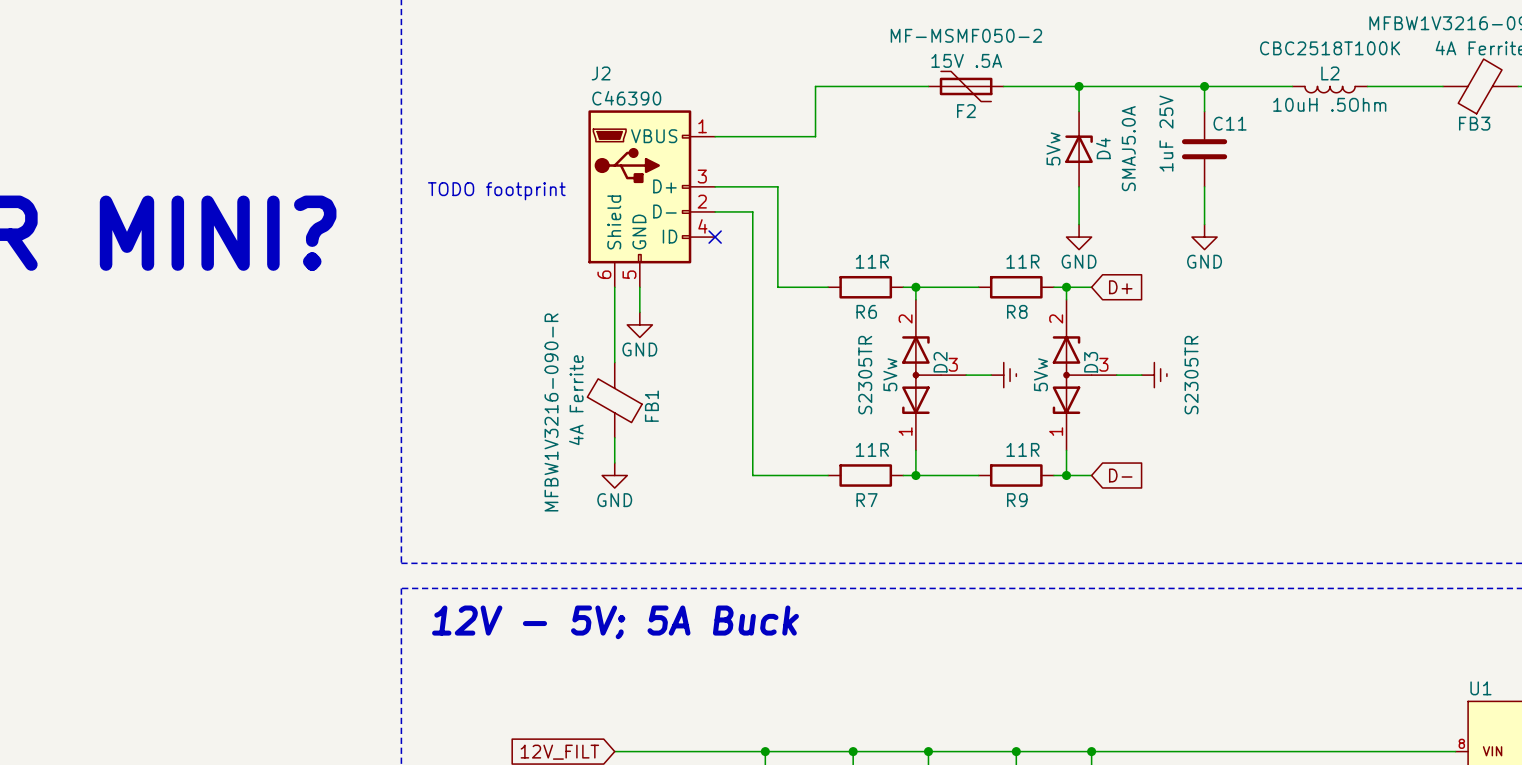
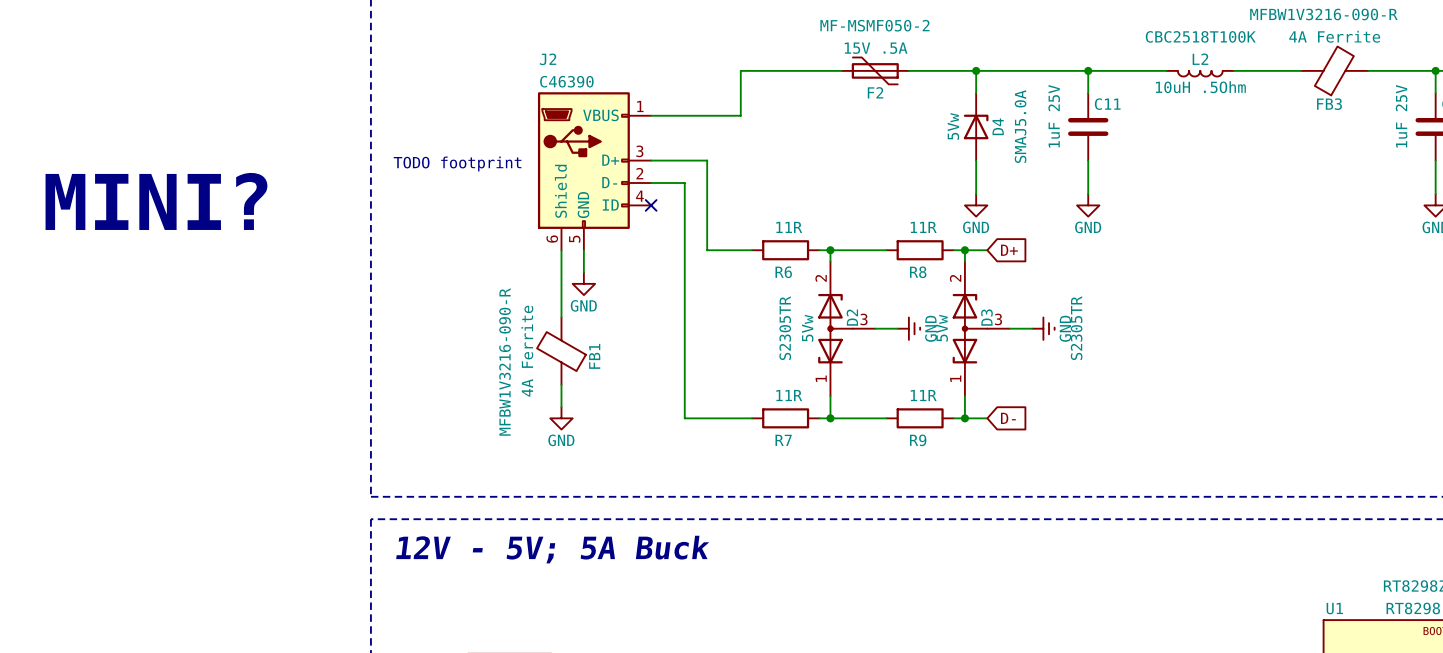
power symbol text: none -> GND (930, 328)
power symbol text: none -> GND (1065, 328)

